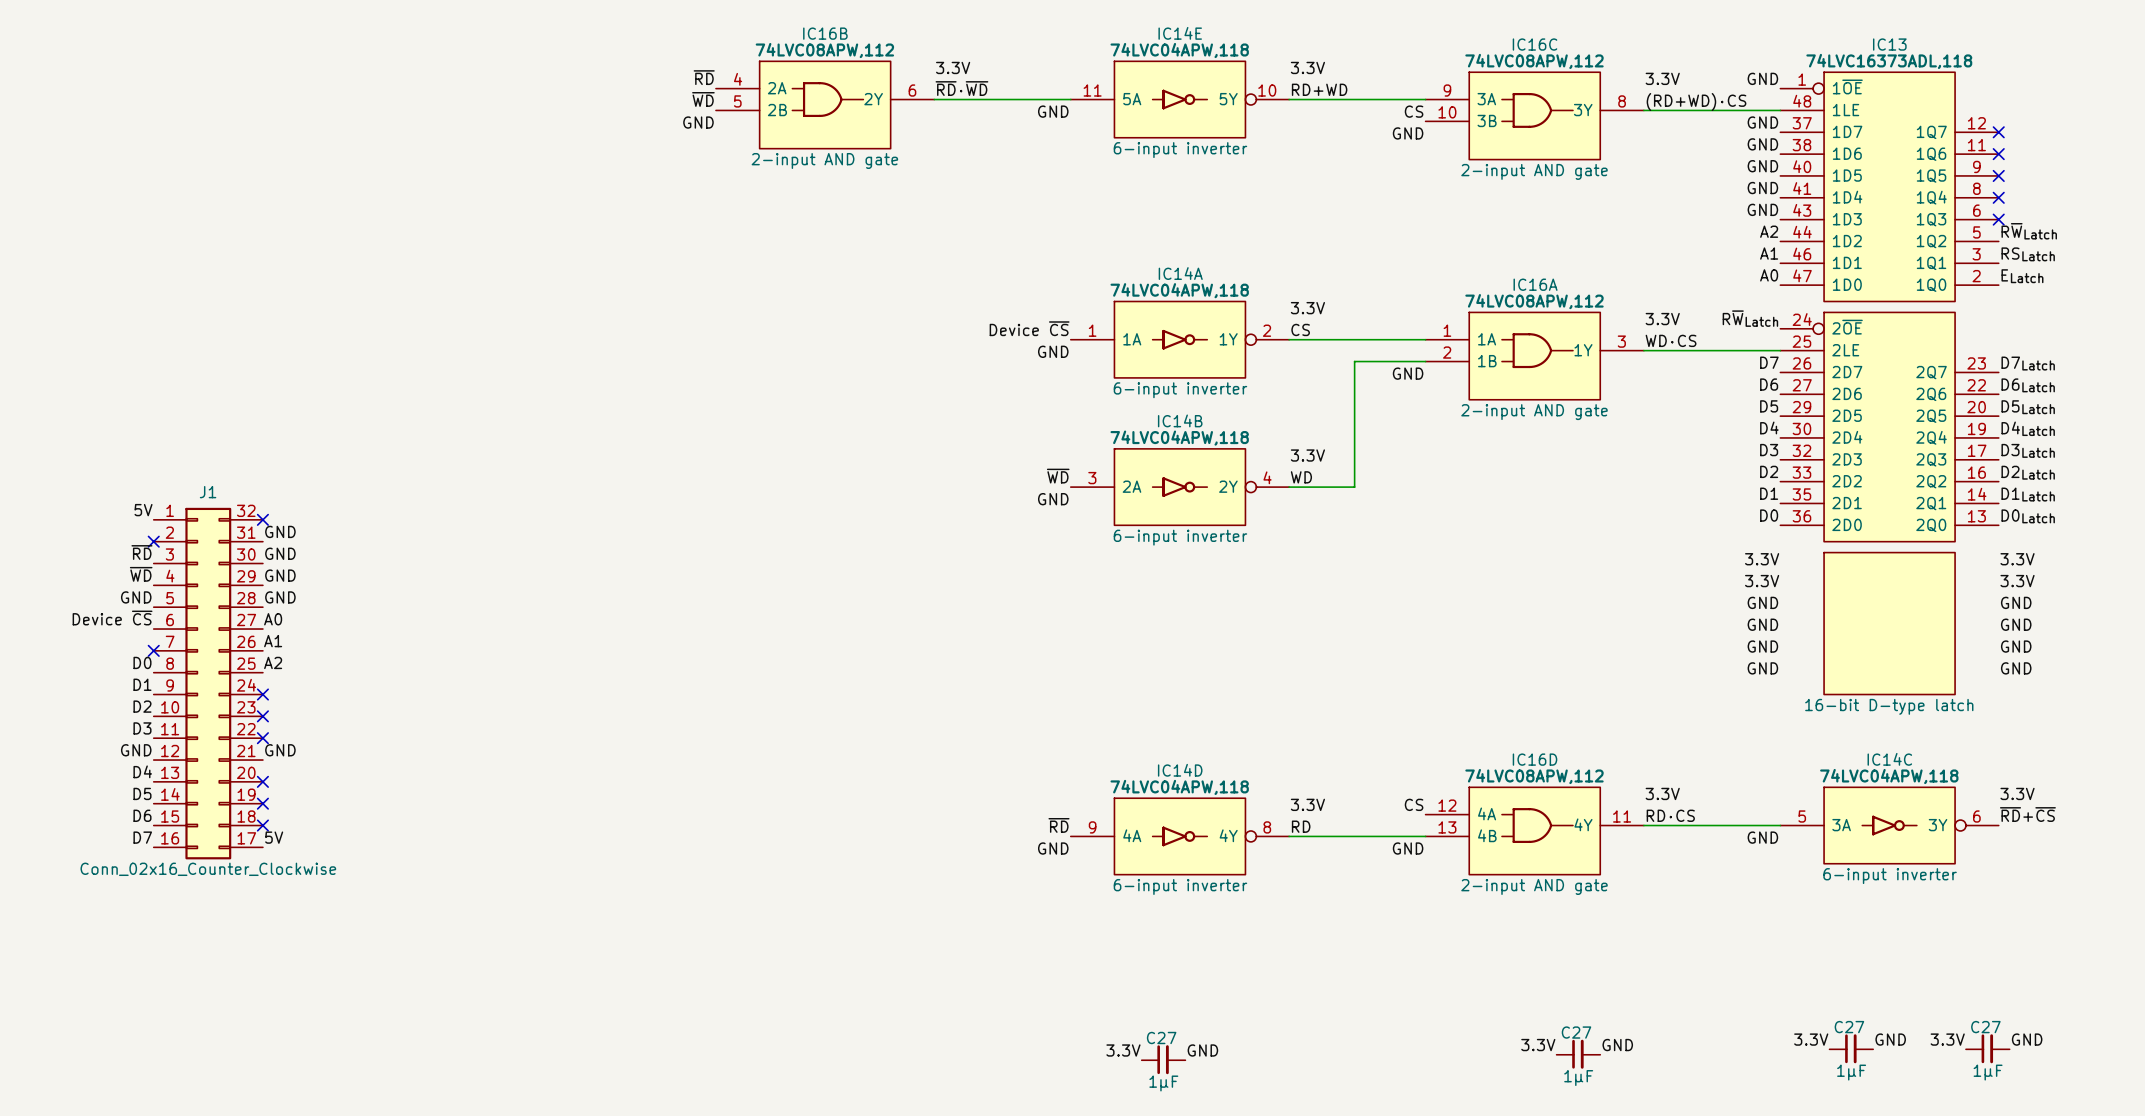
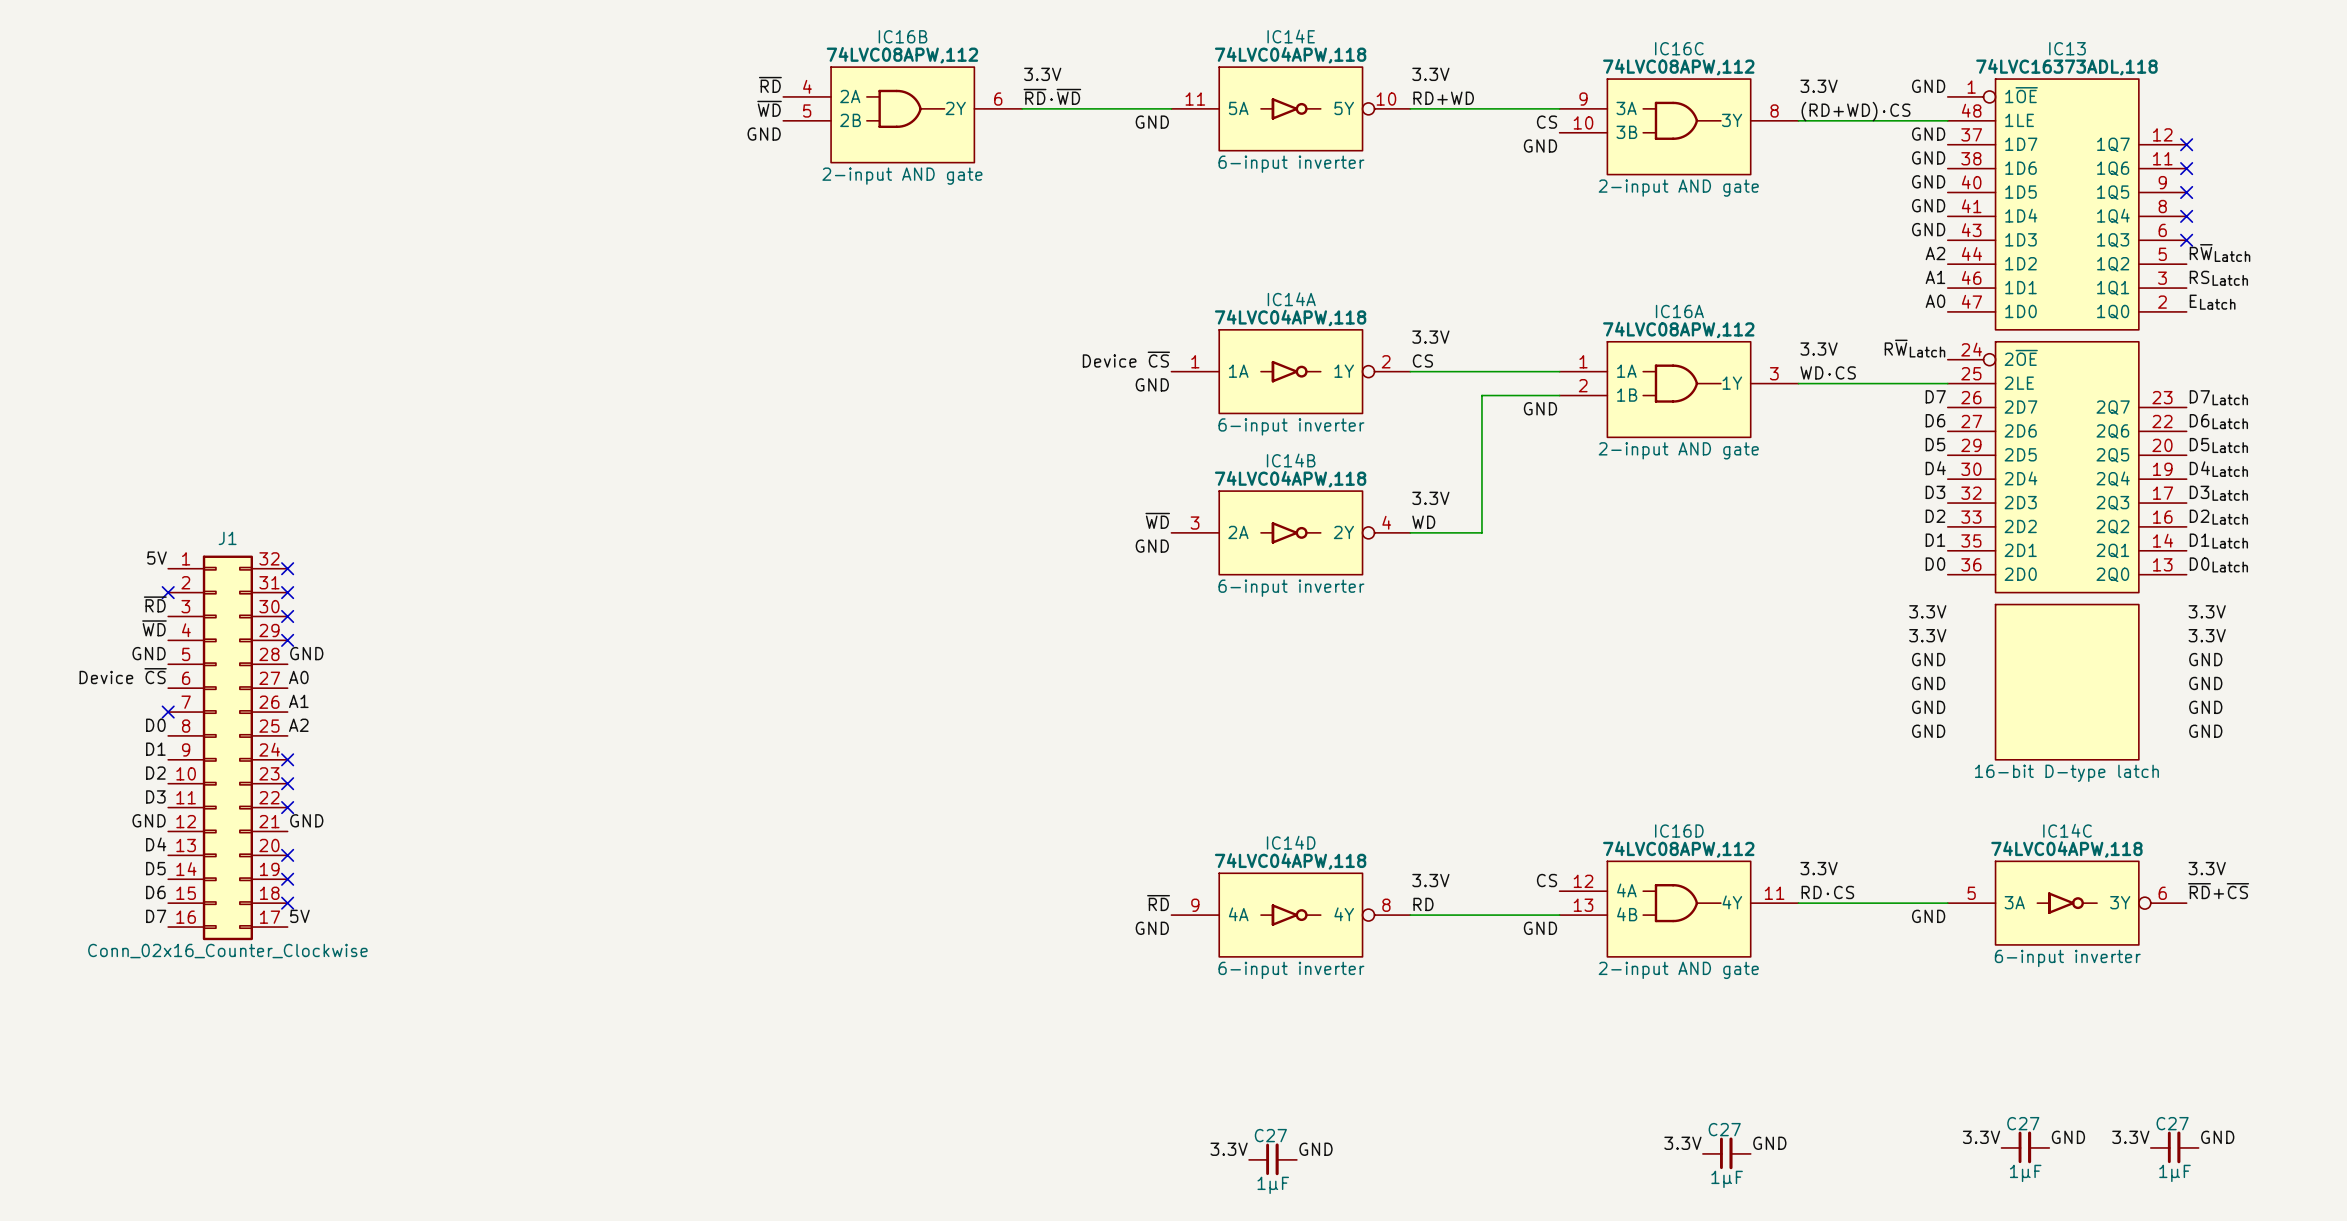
label: GND (280, 531) -> none
no-connect mark: none -> (287, 592)
label: GND (280, 553) -> none
no-connect mark: none -> (287, 616)
label: GND (280, 575) -> none
no-connect mark: none -> (287, 640)

